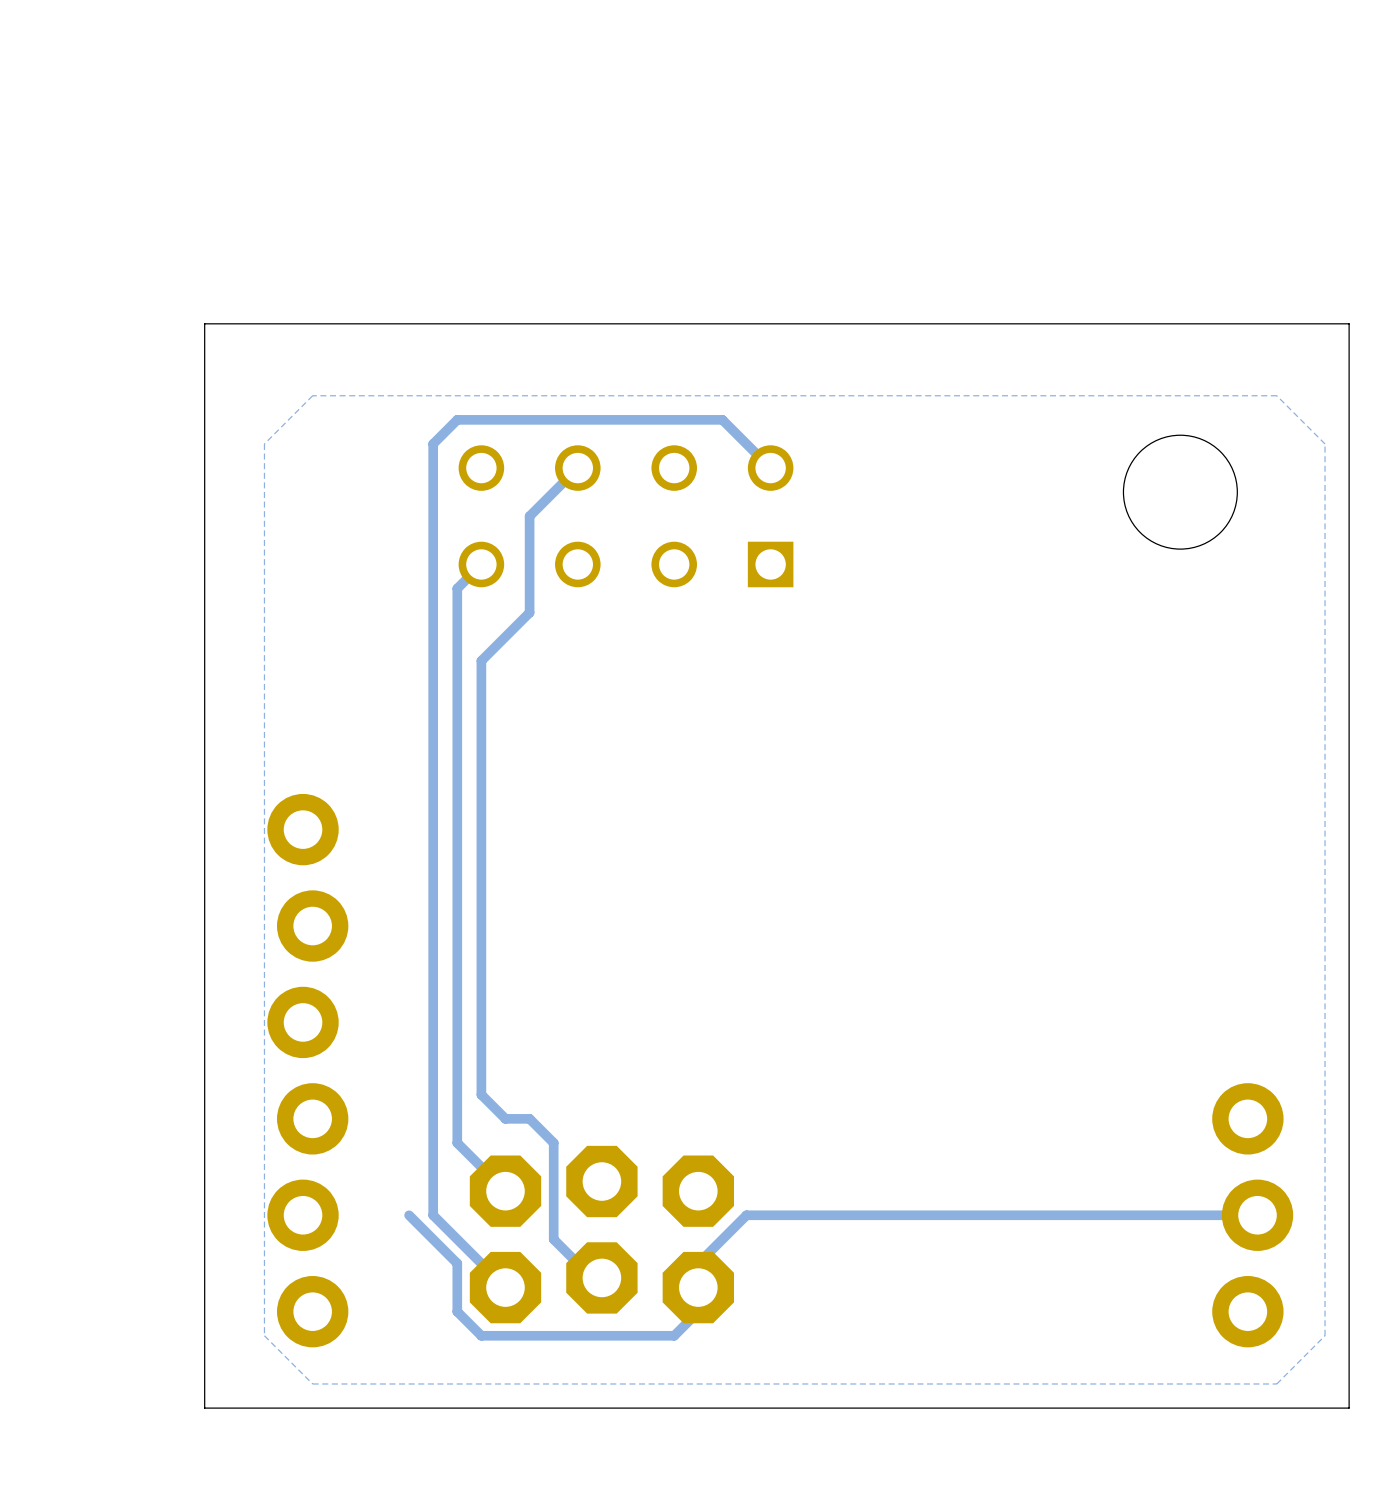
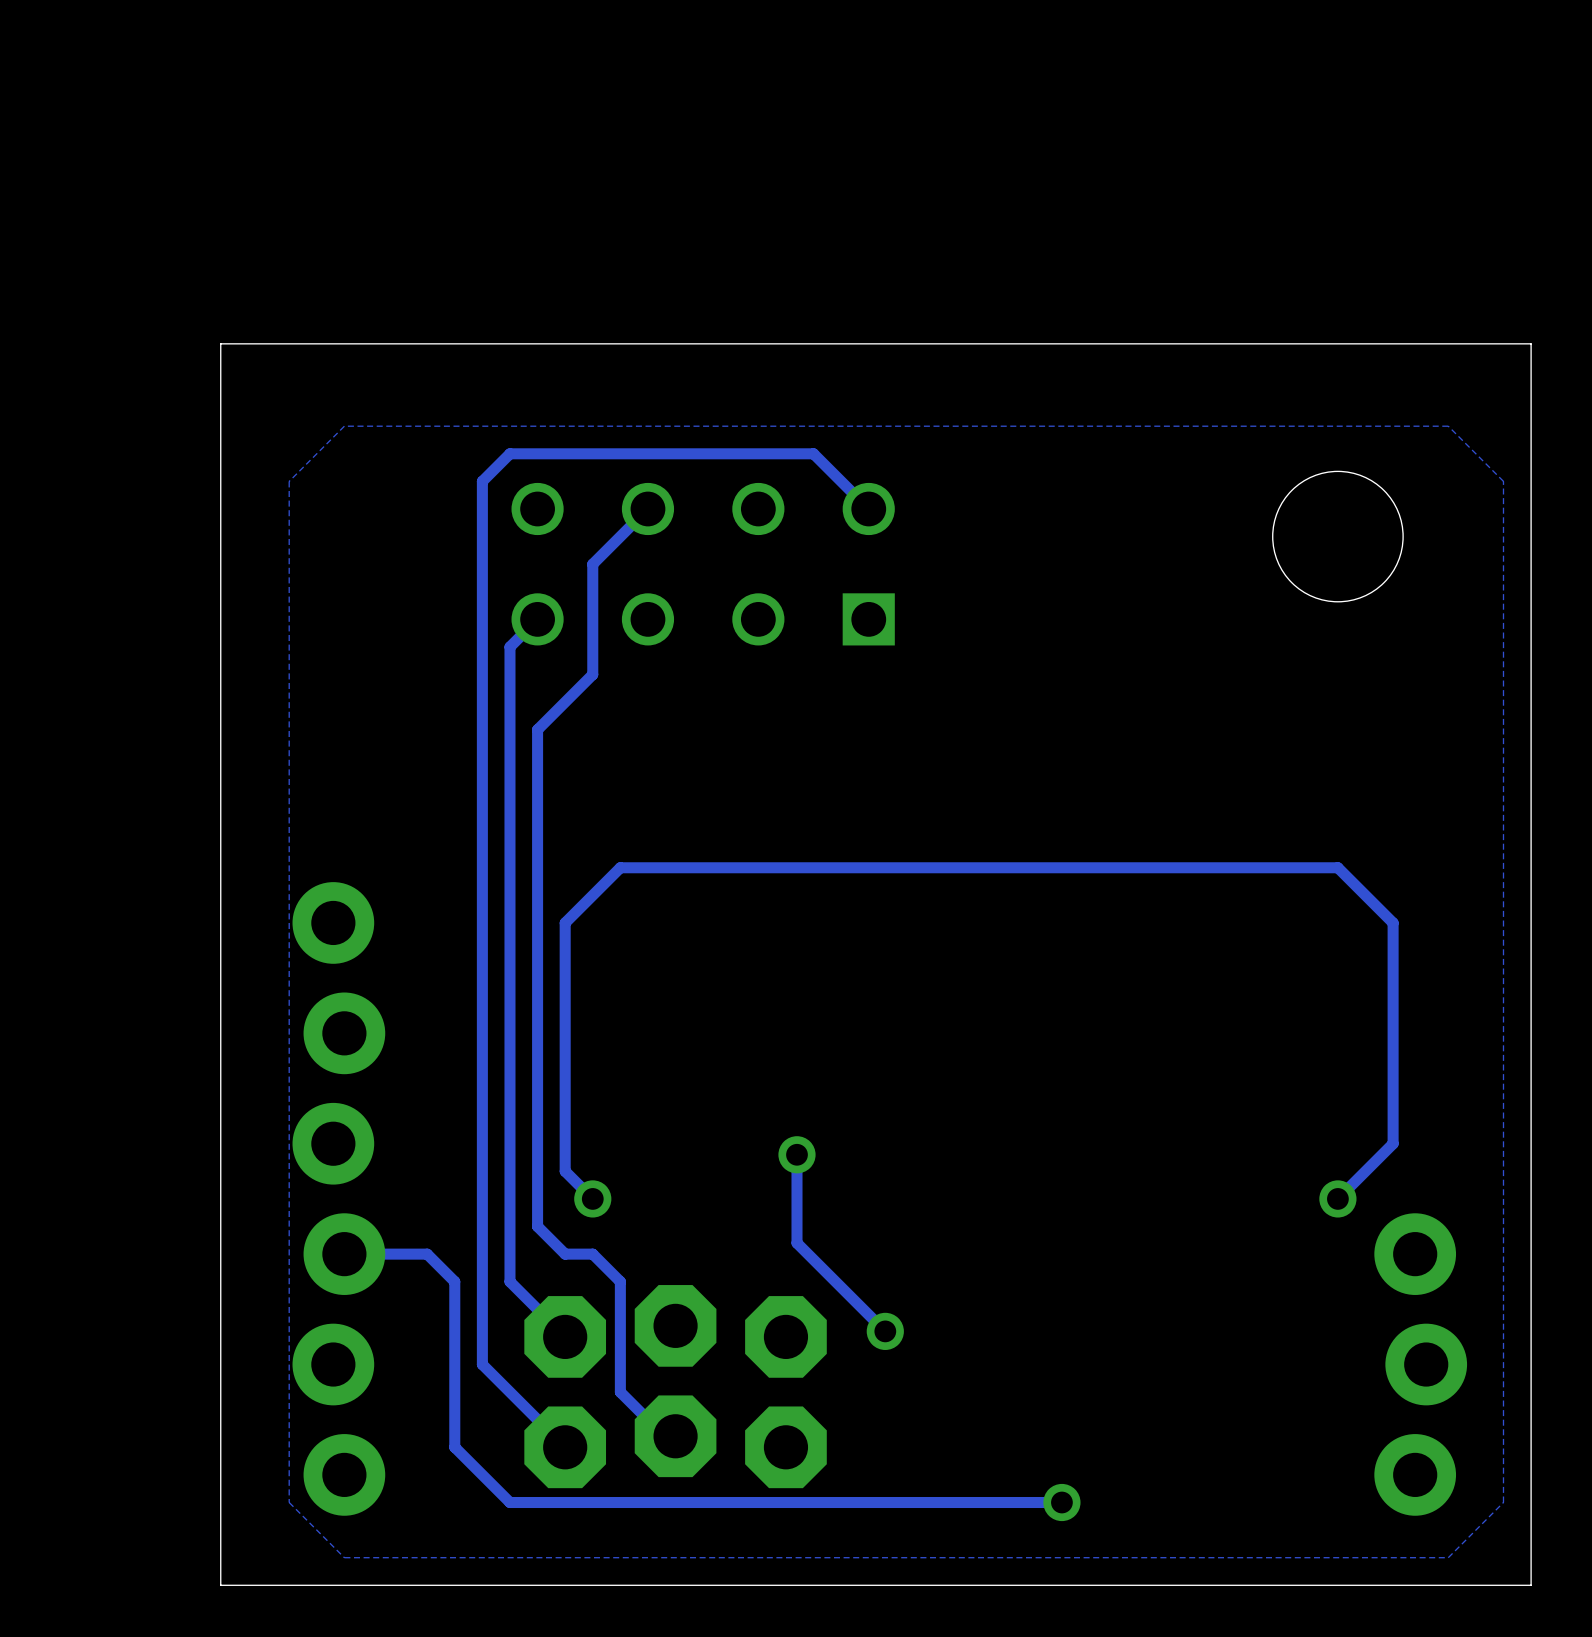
track: none -> (797, 1154) (797, 1243) (885, 1331)
via: none -> (797, 1154)
via: none -> (592, 1198)
track: none -> (1337, 1198) (1393, 1143) (1393, 922) (1337, 867) (620, 867) (565, 922) (565, 1171) (592, 1198)
via: none -> (1337, 1198)
via: none -> (885, 1331)
track: (409, 1215) (457, 1263) (457, 1311) (481, 1335) -> (344, 1254) (427, 1254) (454, 1281) (454, 1447) (509, 1502) (537, 1502)
track: (1257, 1215) (746, 1215) (698, 1263) (698, 1311) (674, 1335) -> (1061, 1502) (758, 1502)
via: none -> (1061, 1502)

